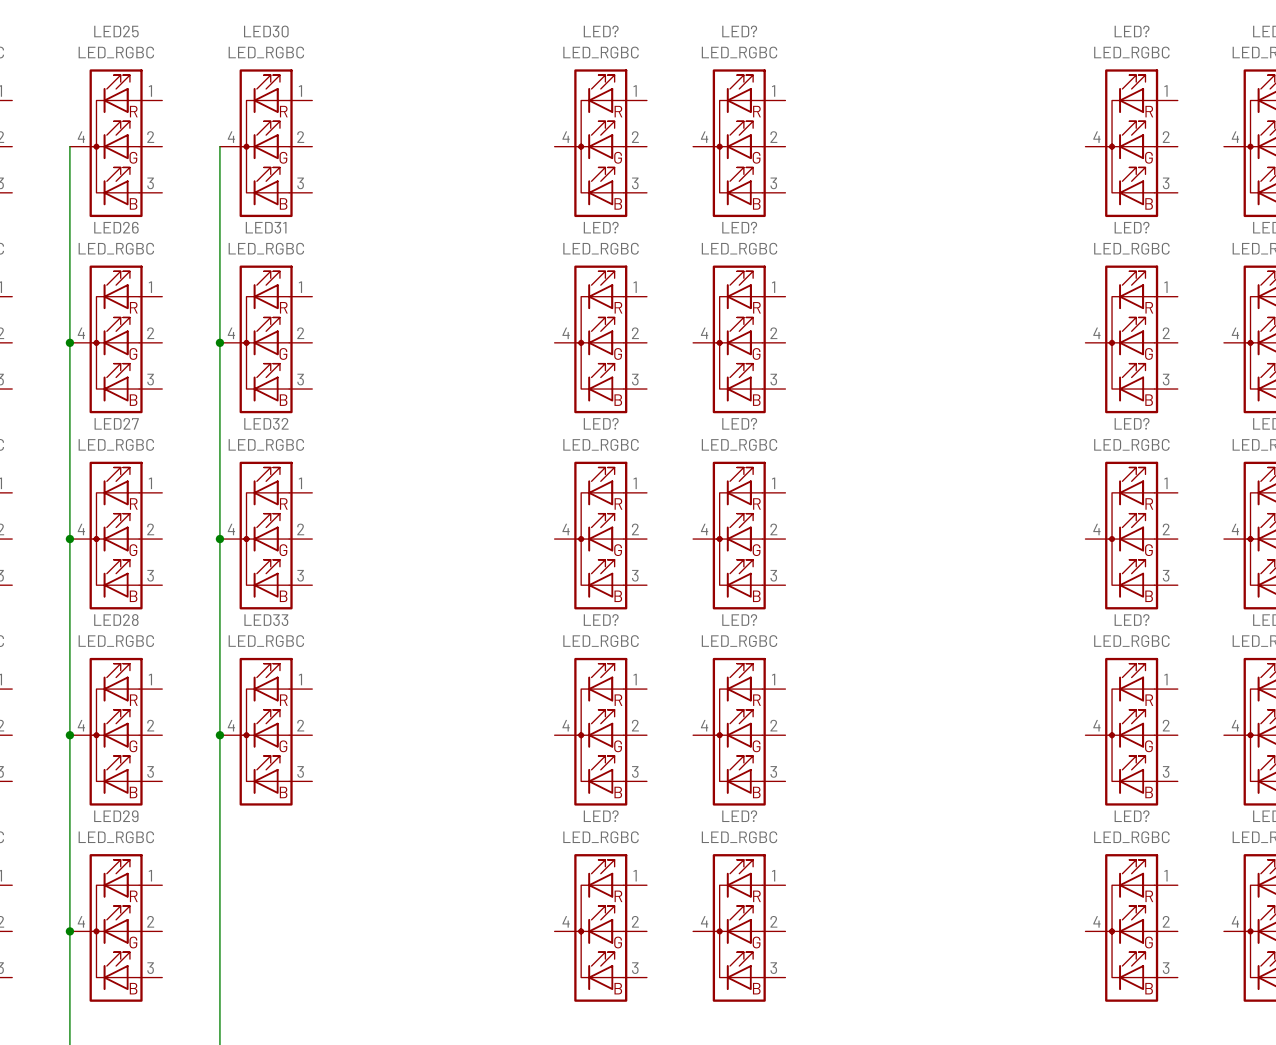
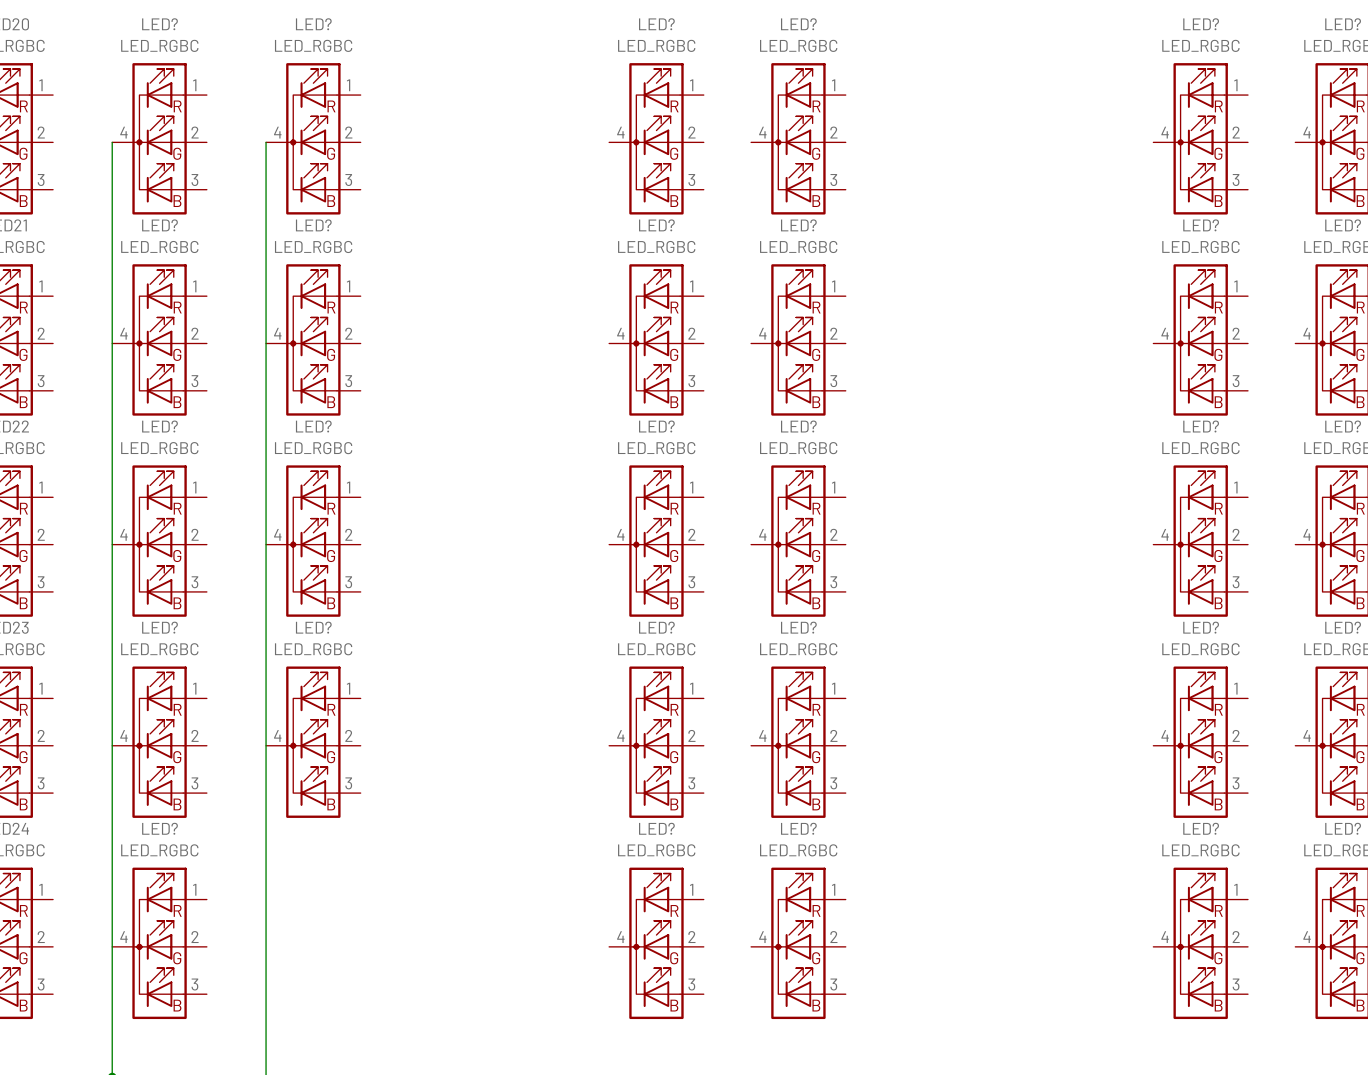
LED25 name: LED25 (116, 31) -> LED? (159, 24)
LED30 name: LED30 (266, 31) -> LED? (313, 24)
LED26 name: LED26 (116, 227) -> LED? (159, 225)
LED31 name: LED31 (266, 227) -> LED? (313, 225)
junction: (69, 342) -> none
junction: (219, 342) -> none
LED27 name: LED27 (116, 423) -> LED? (159, 426)
LED32 name: LED32 (266, 423) -> LED? (313, 426)
junction: (69, 539) -> none
junction: (219, 539) -> none
LED28 name: LED28 (116, 620) -> LED? (159, 627)
LED33 name: LED33 (266, 620) -> LED? (313, 627)
junction: (69, 735) -> none
junction: (219, 735) -> none
LED29 name: LED29 (116, 816) -> LED? (159, 828)
junction: (69, 931) -> none

